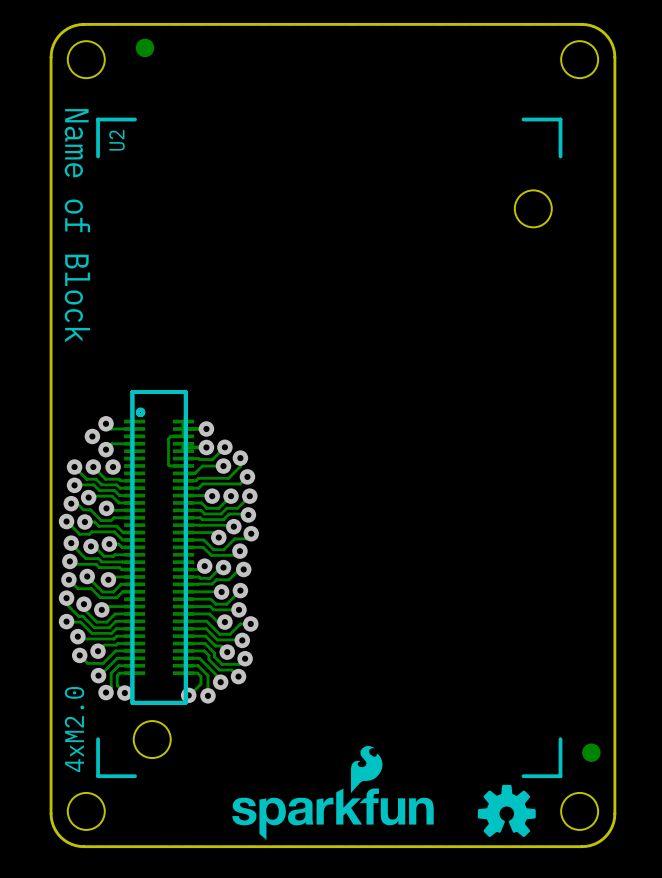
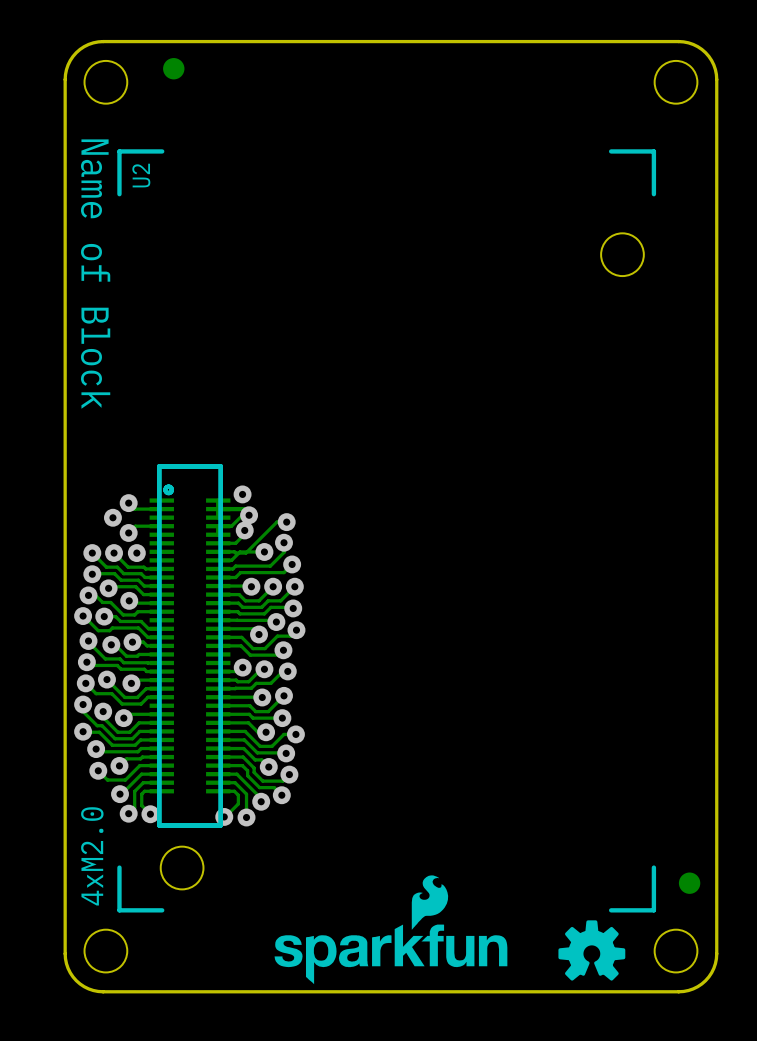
via: none -> (242, 494)
via: (206, 428) -> none
track: none -> (249, 515) (242, 515) (231, 526) (218, 526)
via: none -> (249, 515)
track: (183, 436) (170, 436) (168, 438) (168, 464) (183, 465) -> (286, 522) (276, 522) (245, 553) (218, 551)
via: none -> (286, 522)
track: (206, 447) (183, 447) -> none
track: (224, 447) (212, 459) (198, 458) -> (242, 536) (235, 543)
via: (224, 447) -> none

